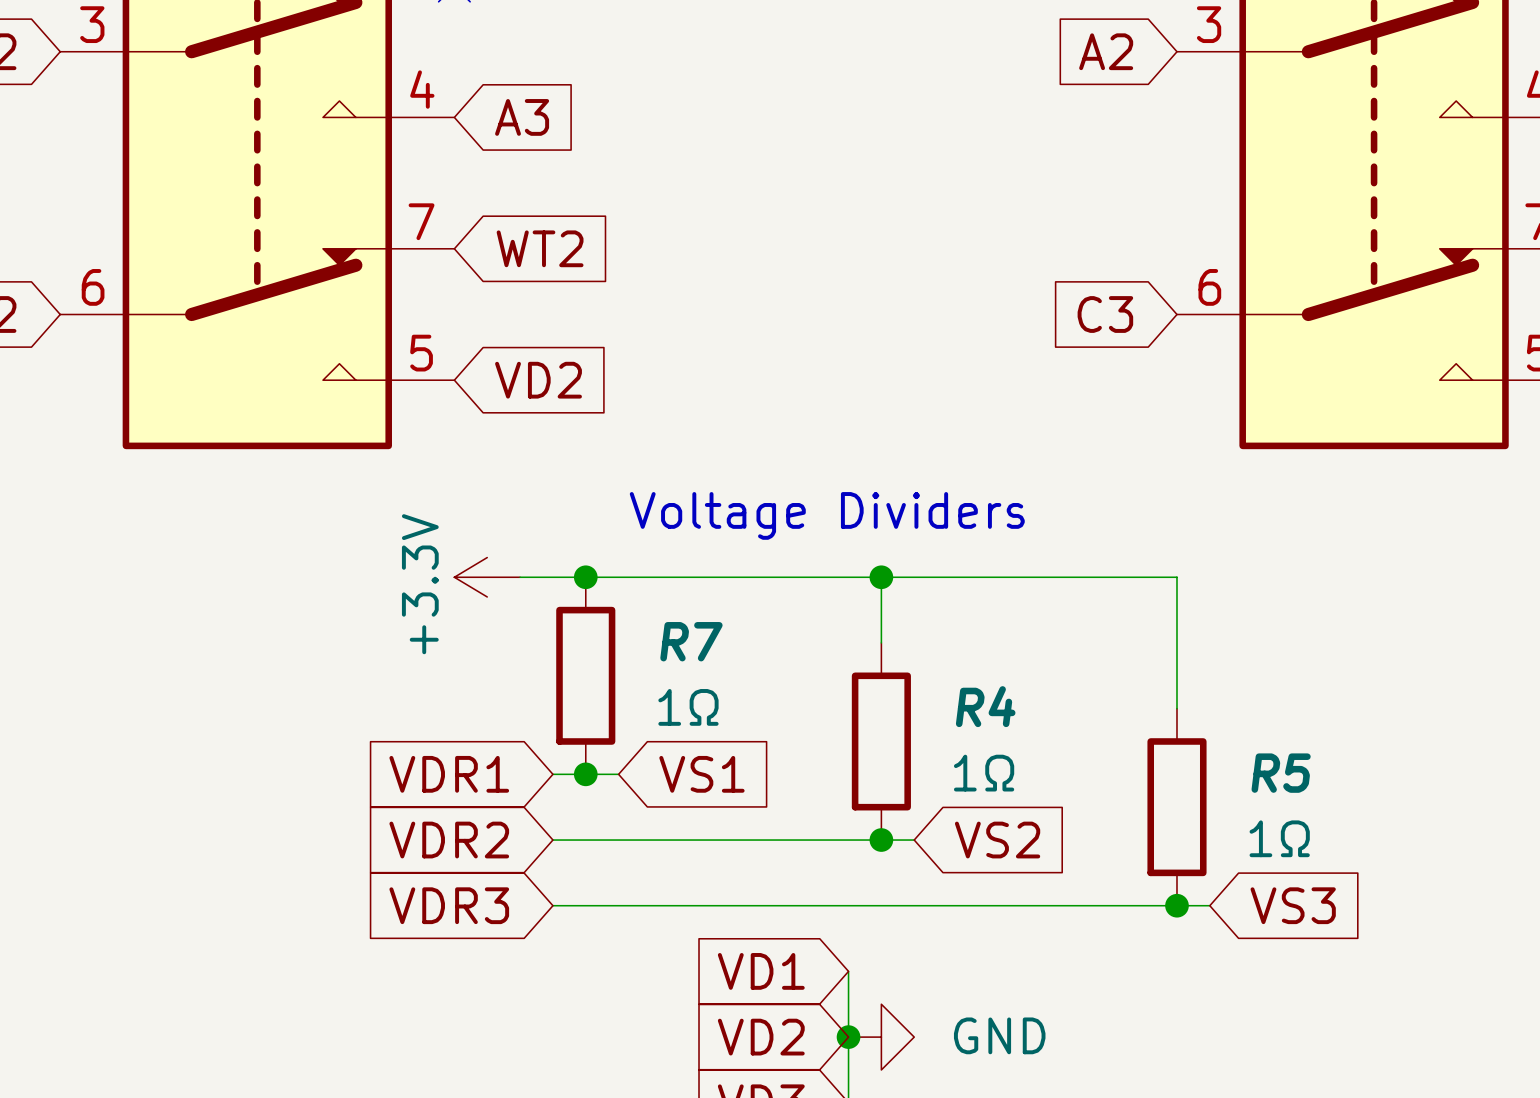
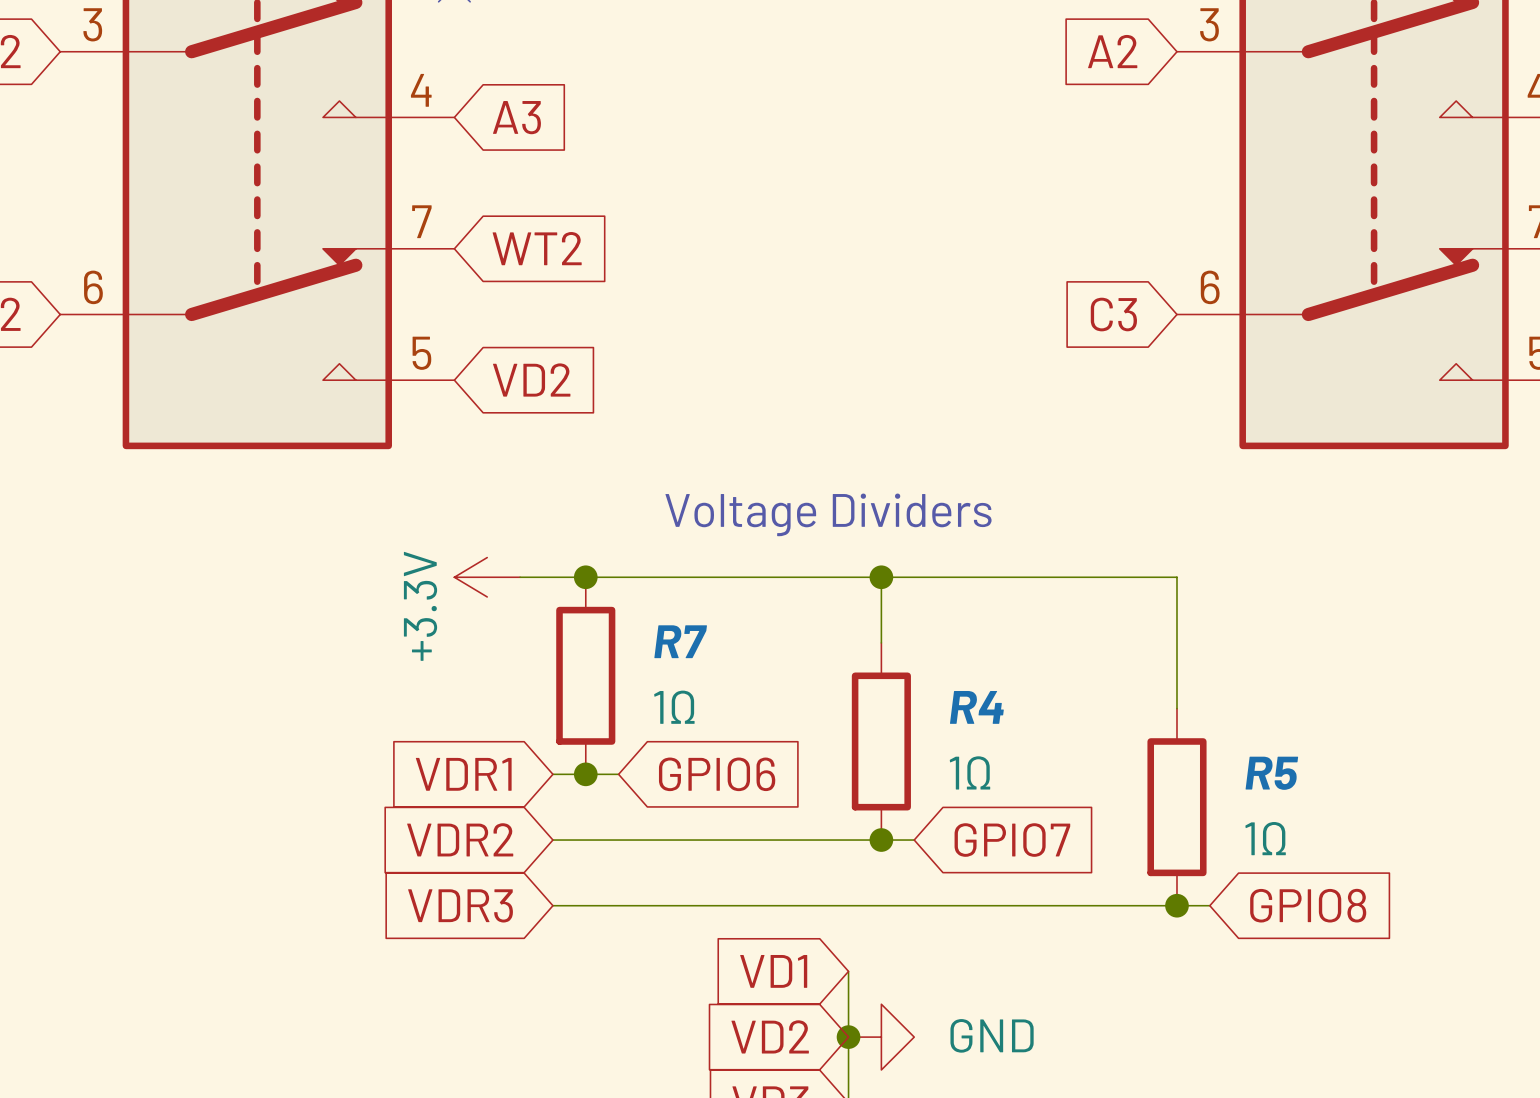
global label: VS1 (701, 774) -> GPIO6 (717, 774)
global label: VS2 (997, 840) -> GPIO7 (1012, 840)
global label: VS3 (1293, 905) -> GPIO8 (1308, 905)

